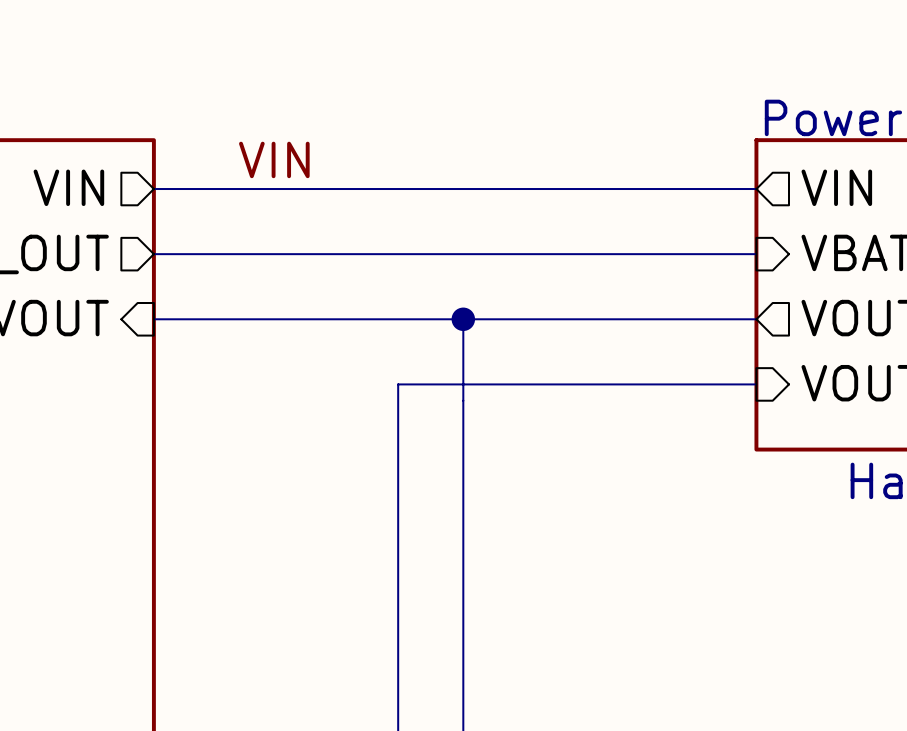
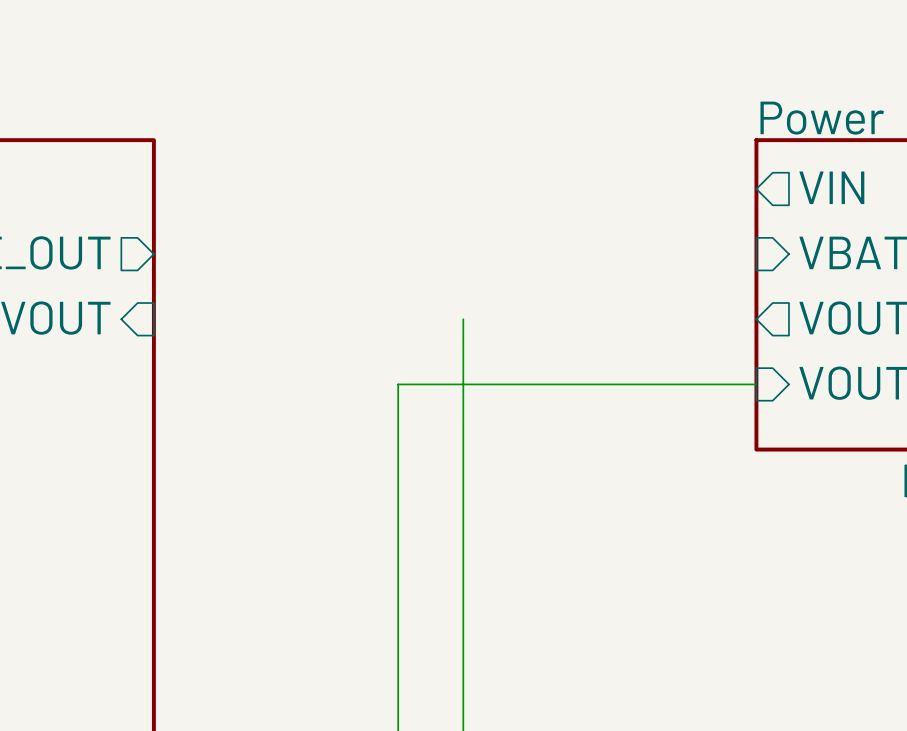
label: VIN (274, 159) -> none
sheet pin: VIN (68, 187) -> none
wire: (153, 189) (756, 189) -> none
wire: (153, 254) (756, 254) -> none
wire: (153, 319) (756, 319) -> none
junction: (463, 319) -> none

